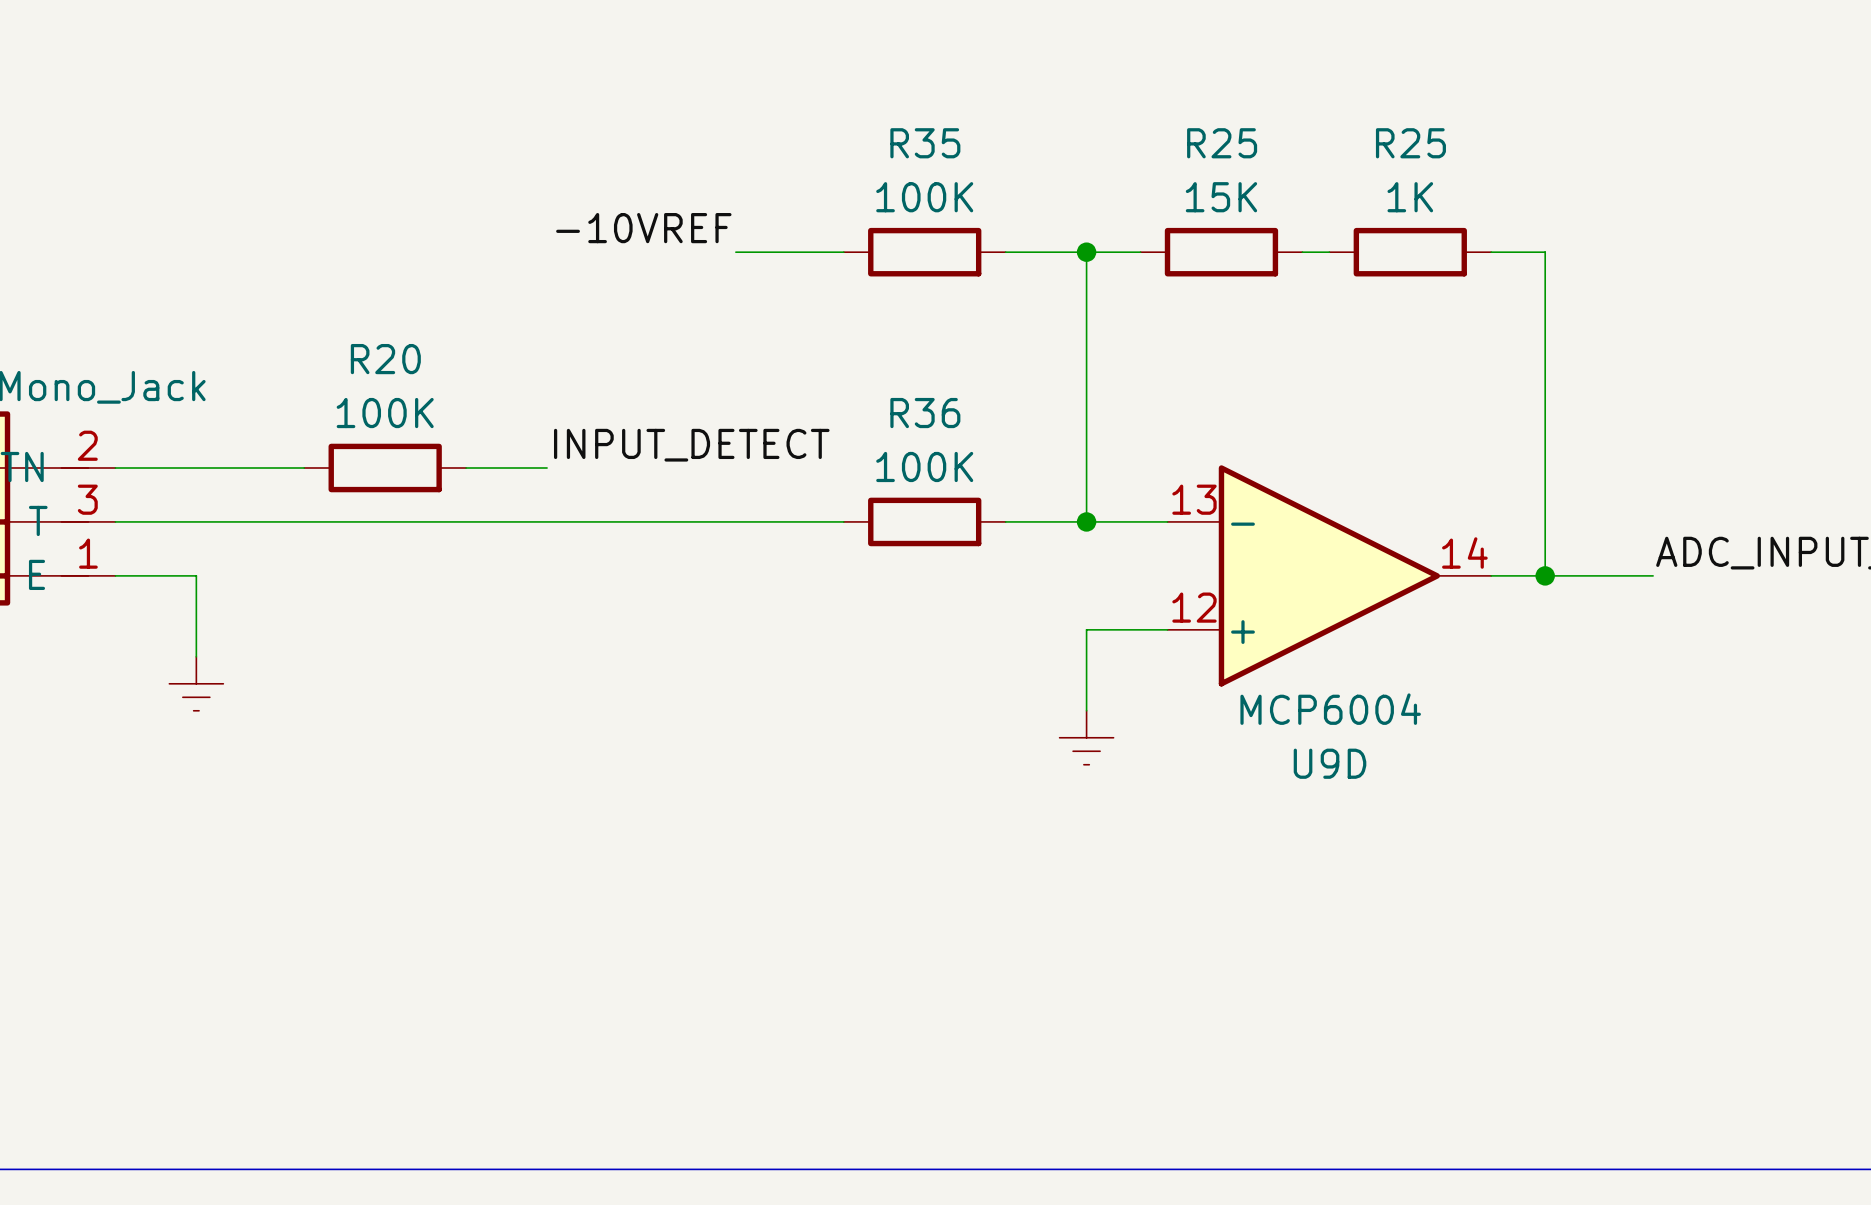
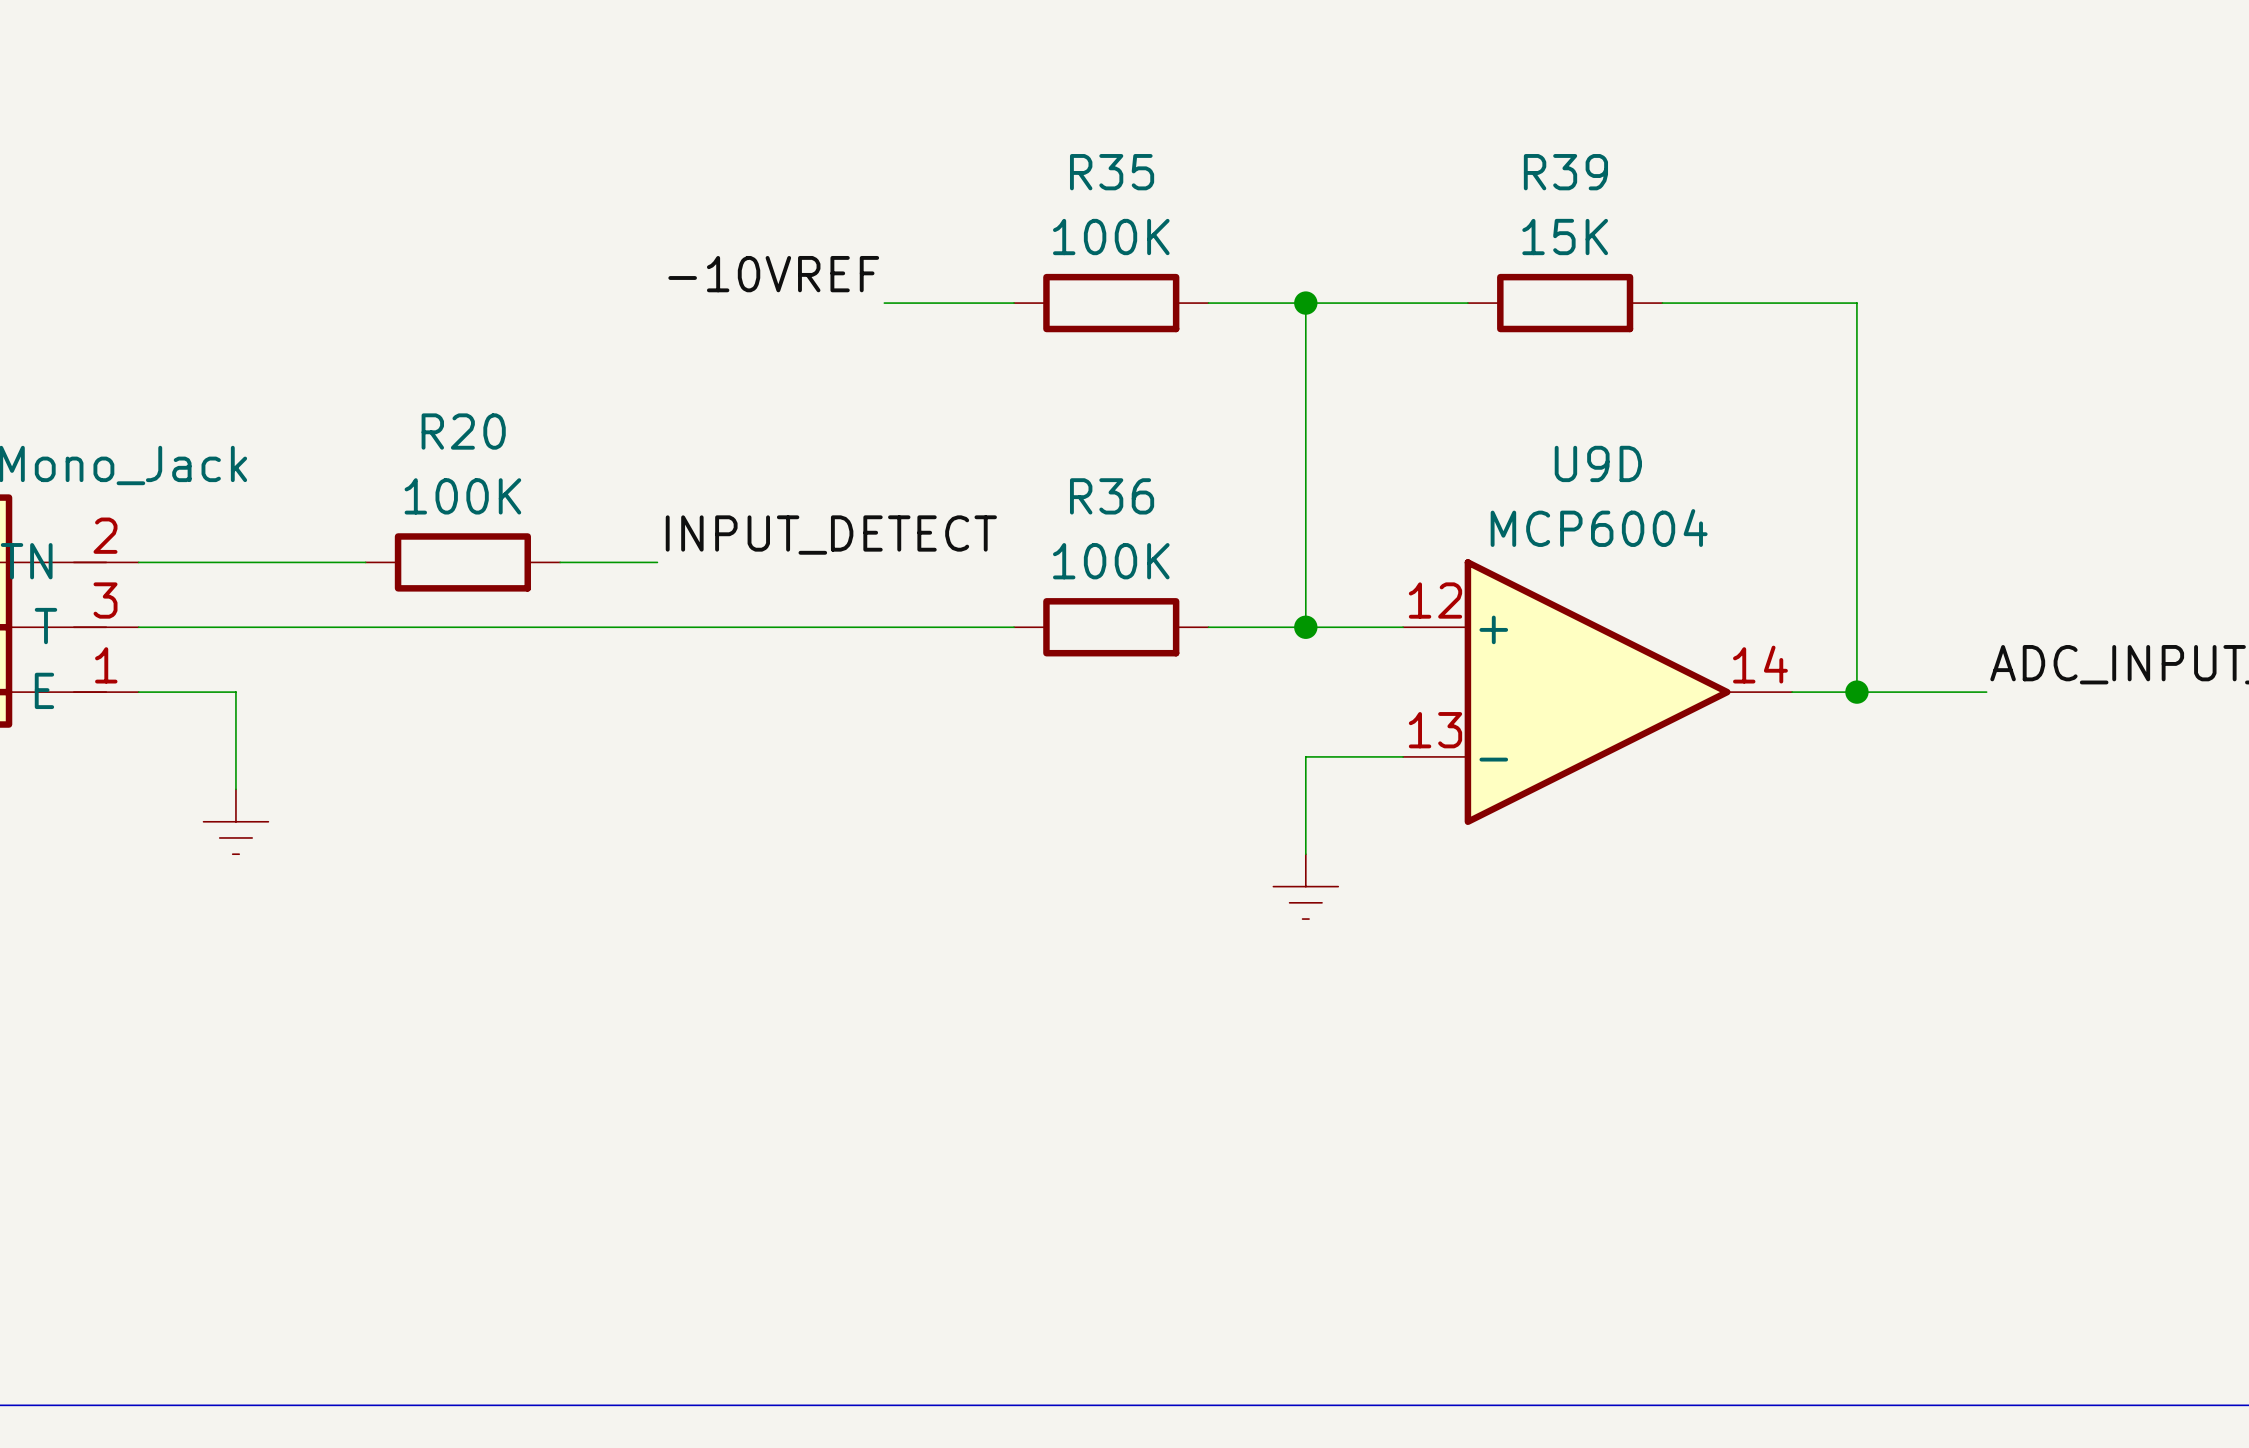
wire: none -> (1370, 303) (1467, 303)
R25: 15K (1221, 252) -> none
wire: (1302, 252) (1329, 252) -> none
R39: none -> 15K (1565, 303)
wire: none -> (1662, 303) (1792, 303)
R25: 1K (1410, 252) -> none
U9D flip: as is (1329, 575) -> up-down (1597, 692)

